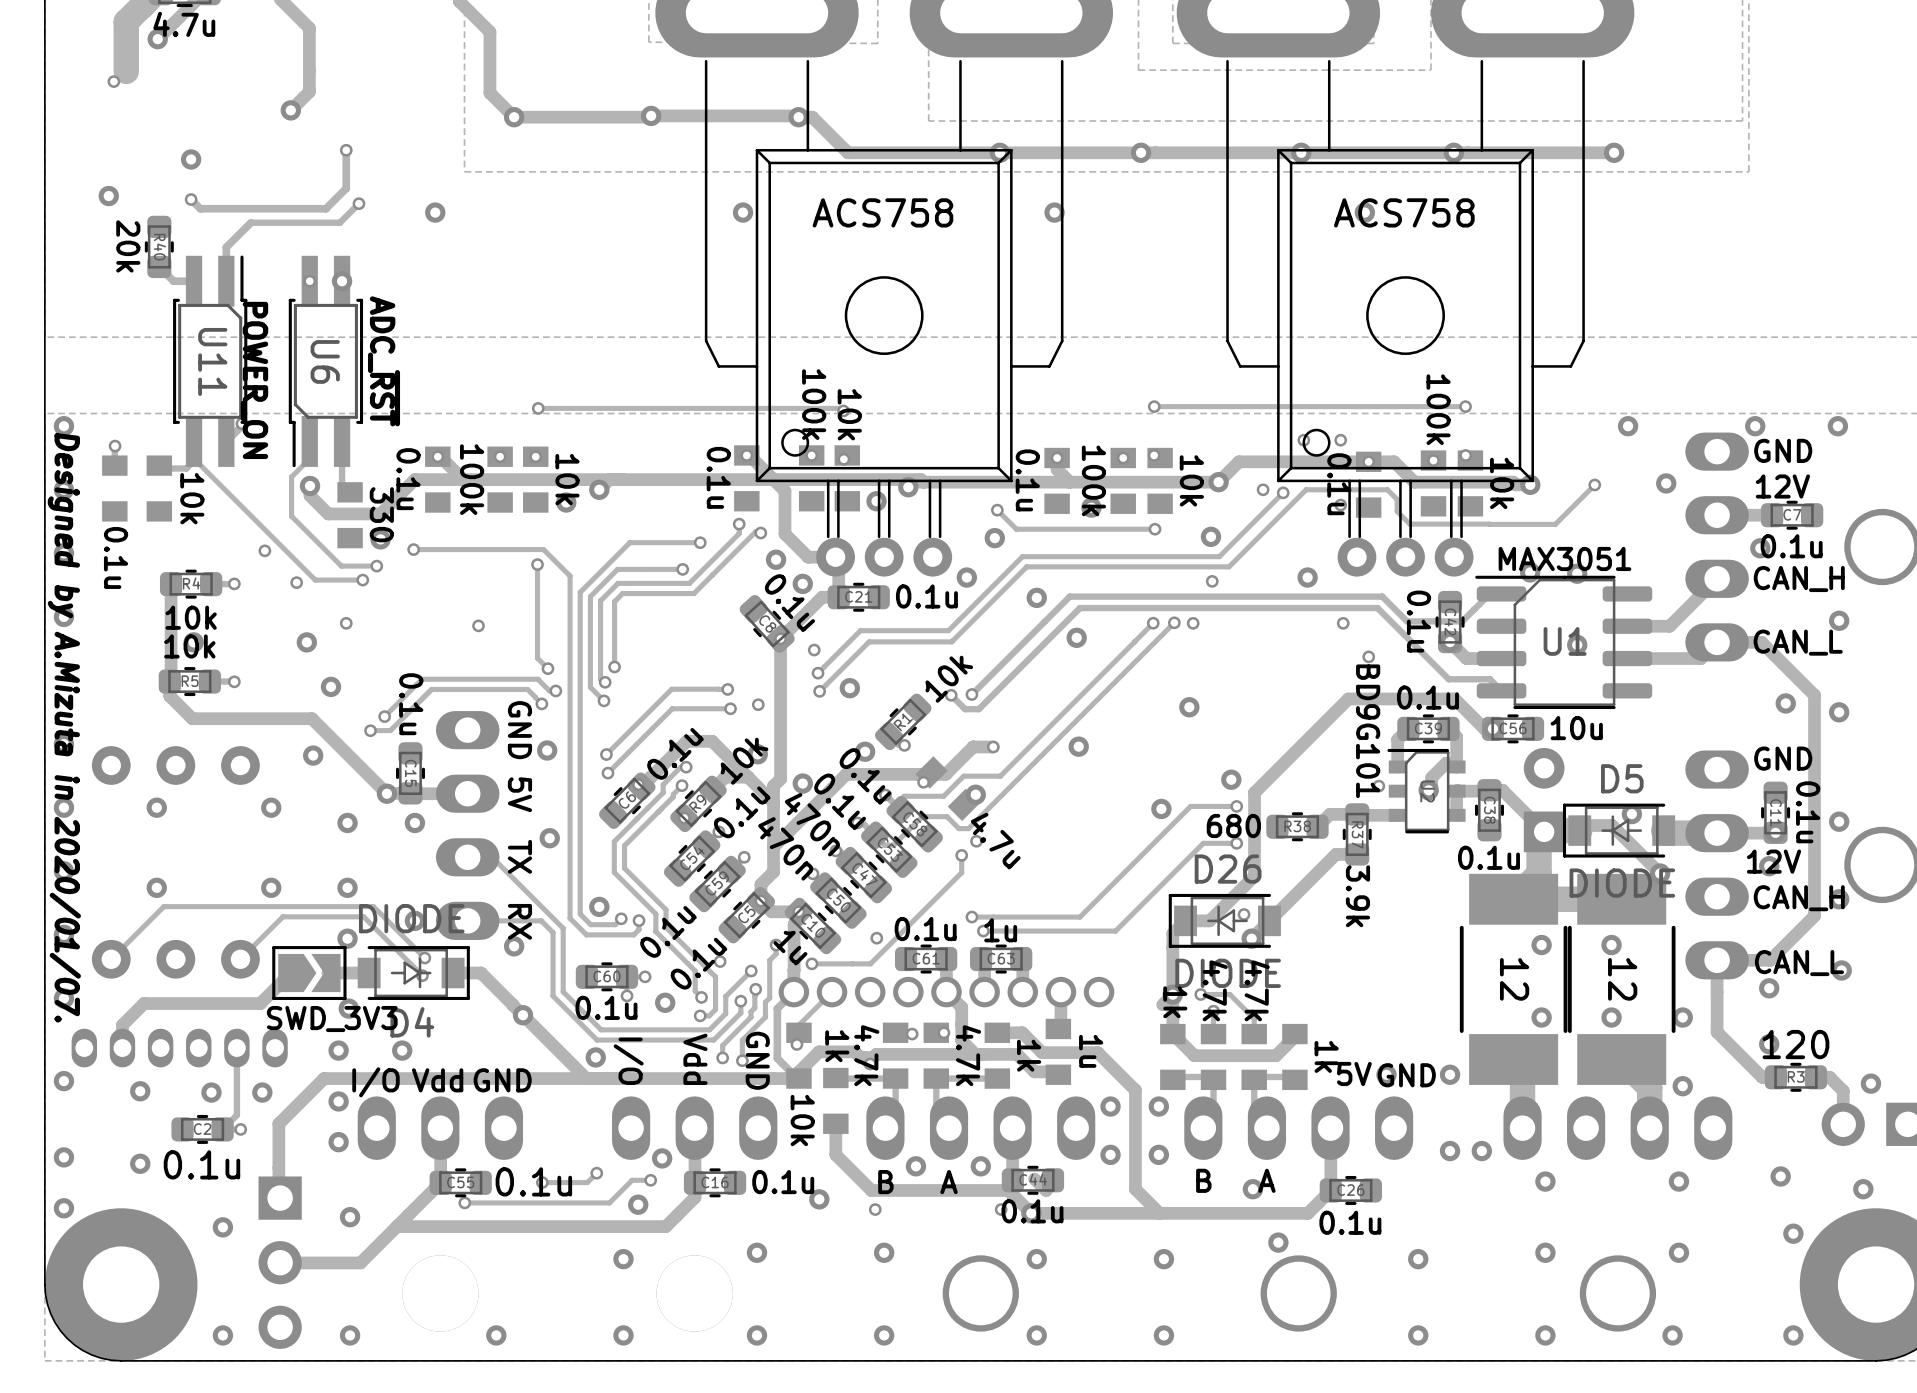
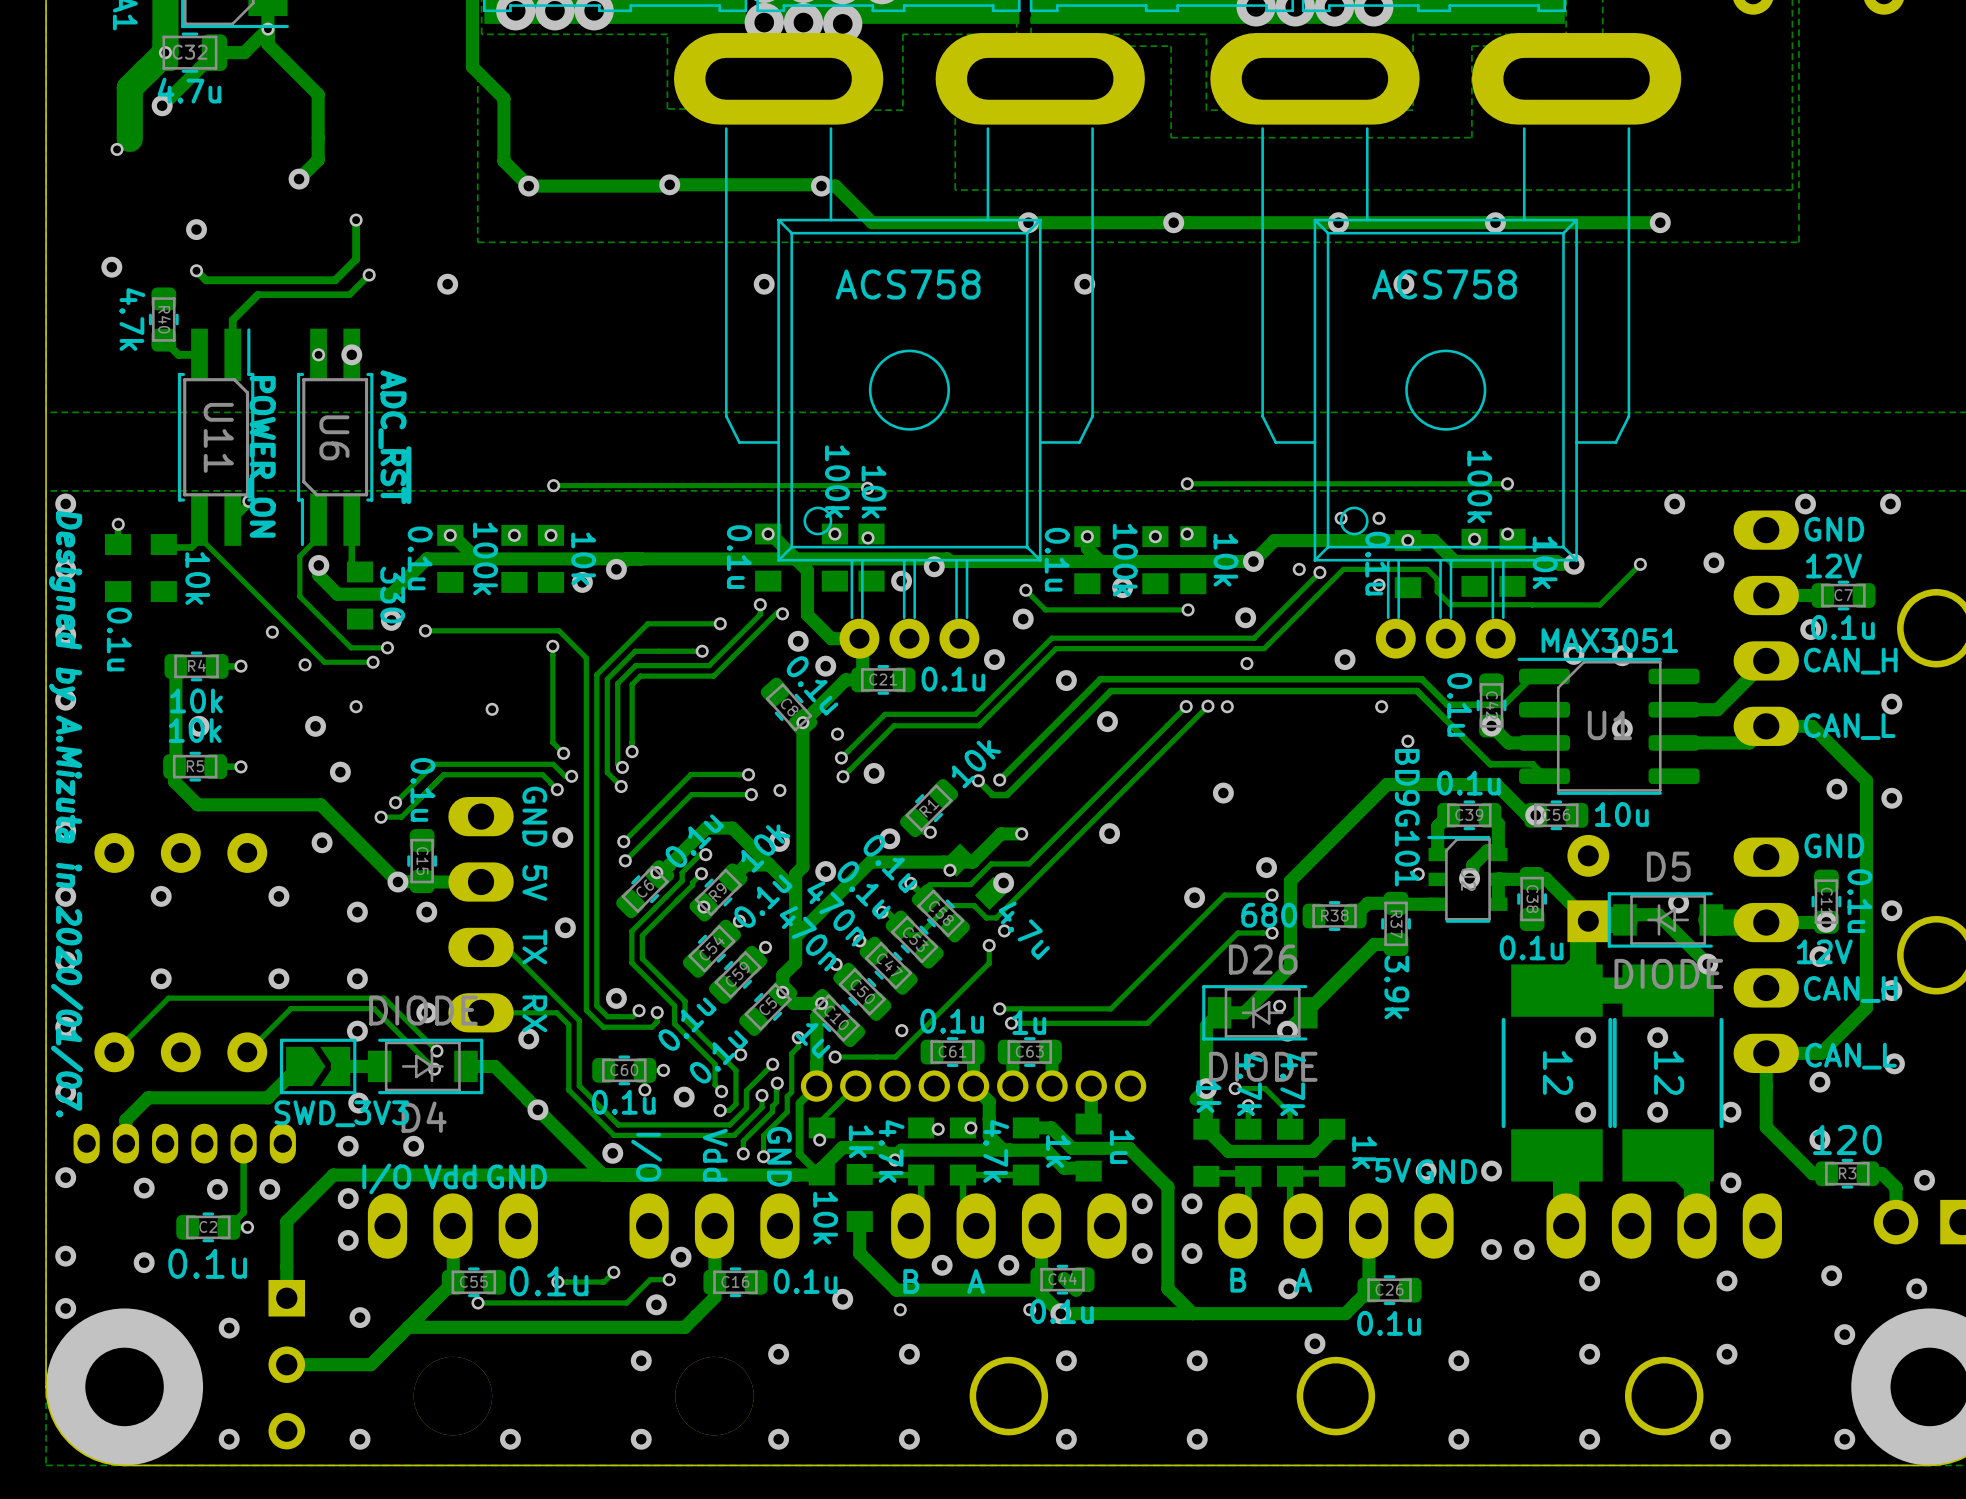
R40 value: 20k (128, 246) -> 4.7k (132, 319)
part footprint: [258, 1176, 302, 1349] -> [268, 1279, 306, 1450]

